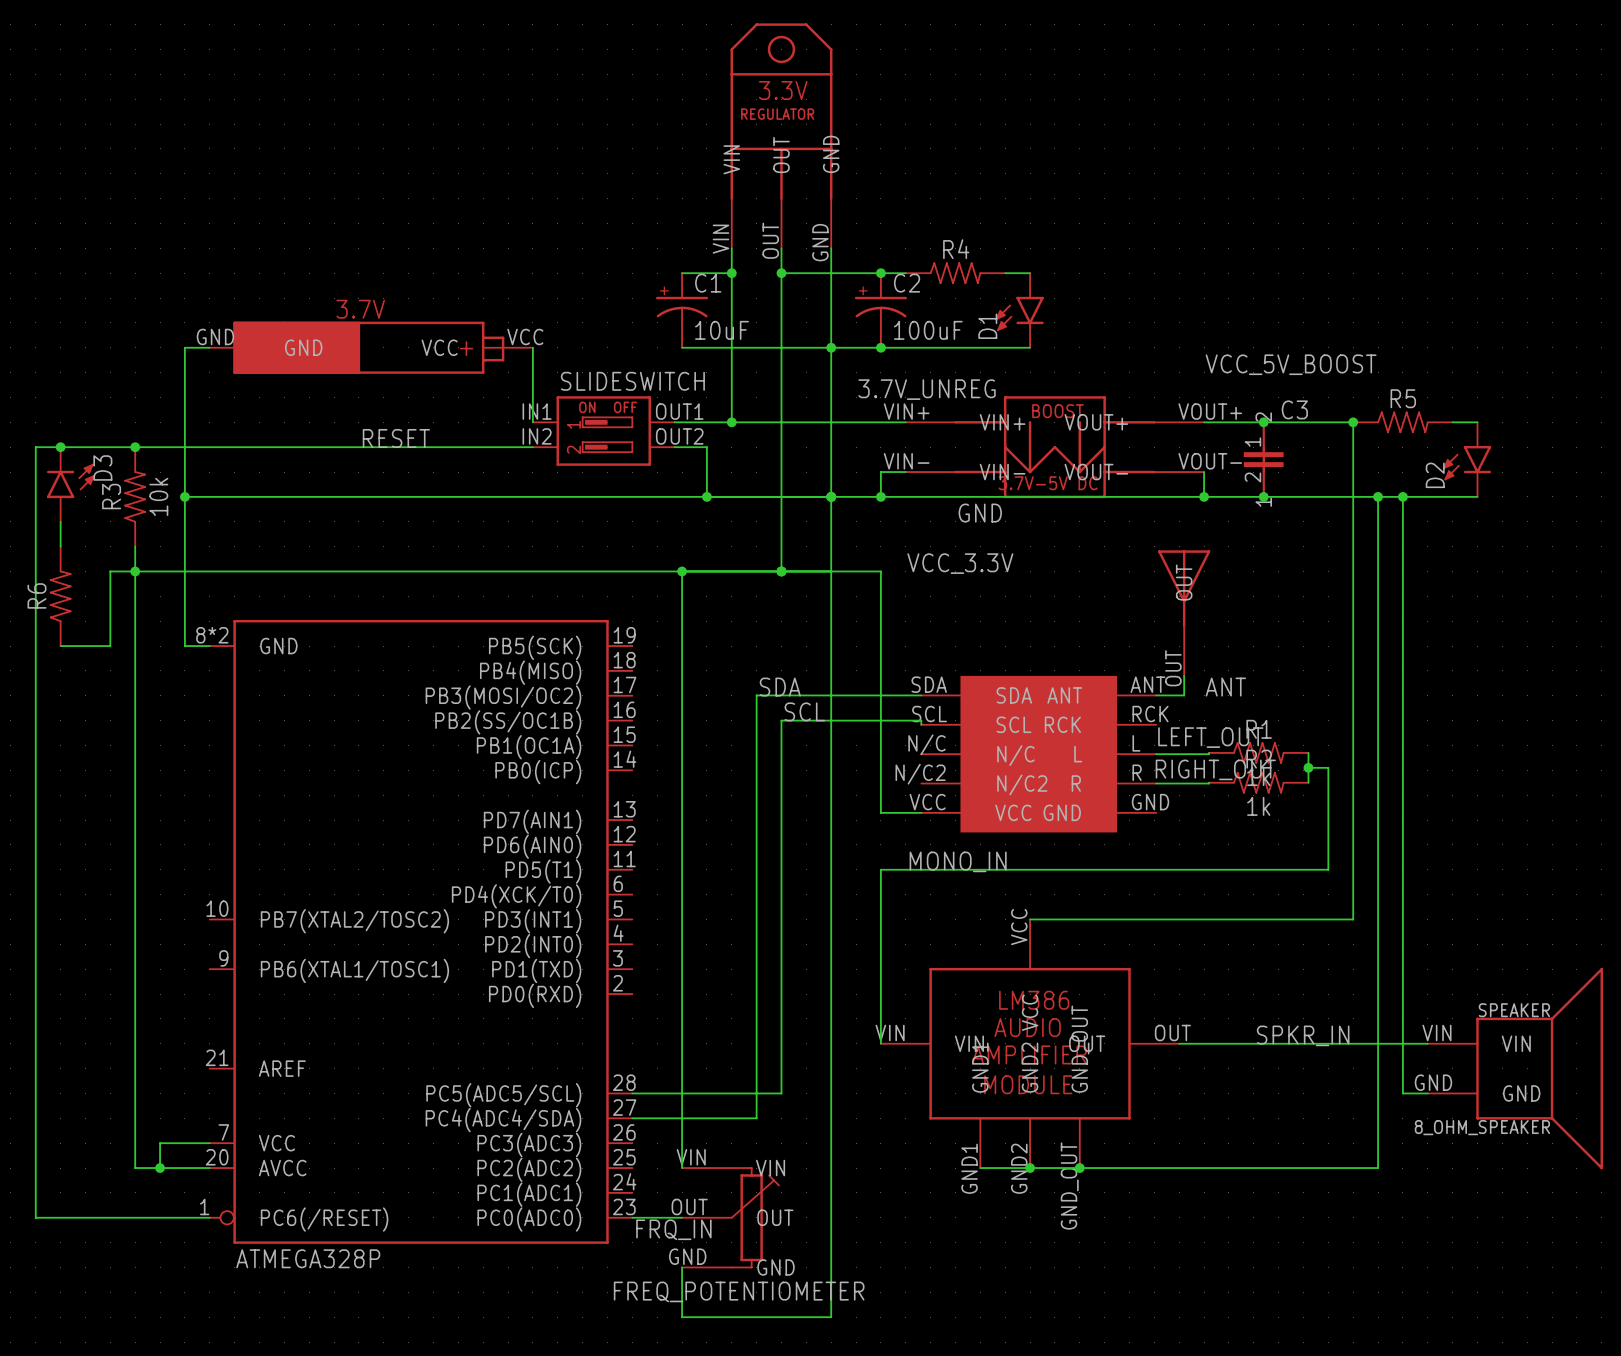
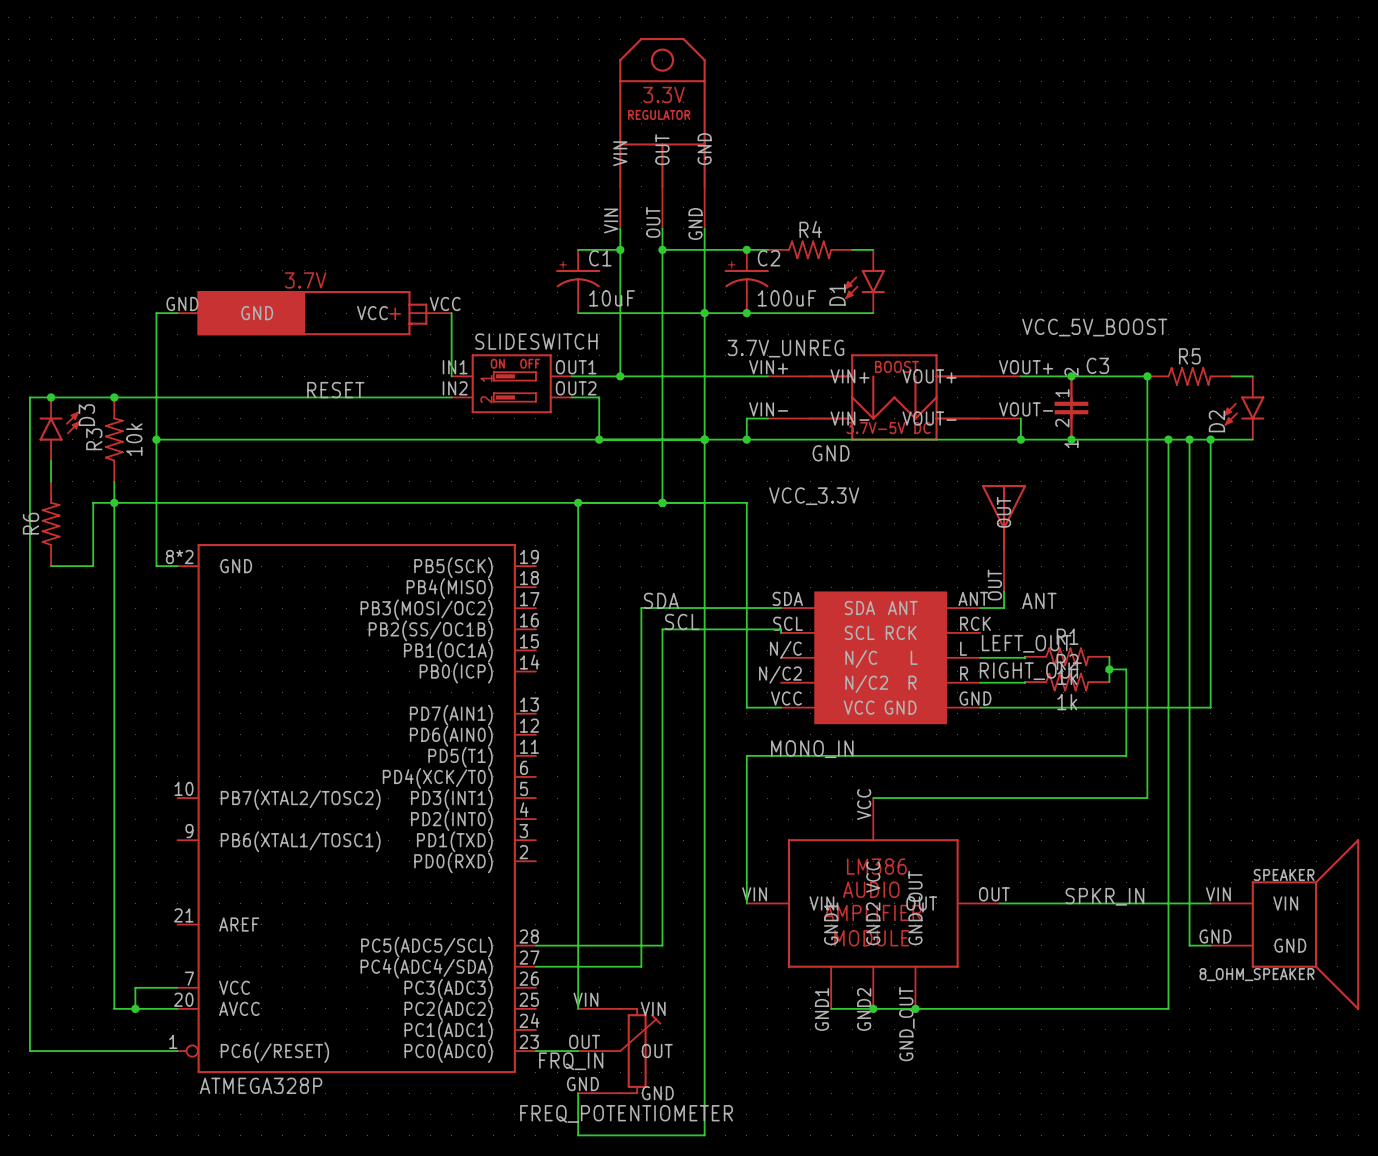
wire: none -> (1210, 439) (1210, 707) (980, 707)
junction: none -> (1210, 439)

